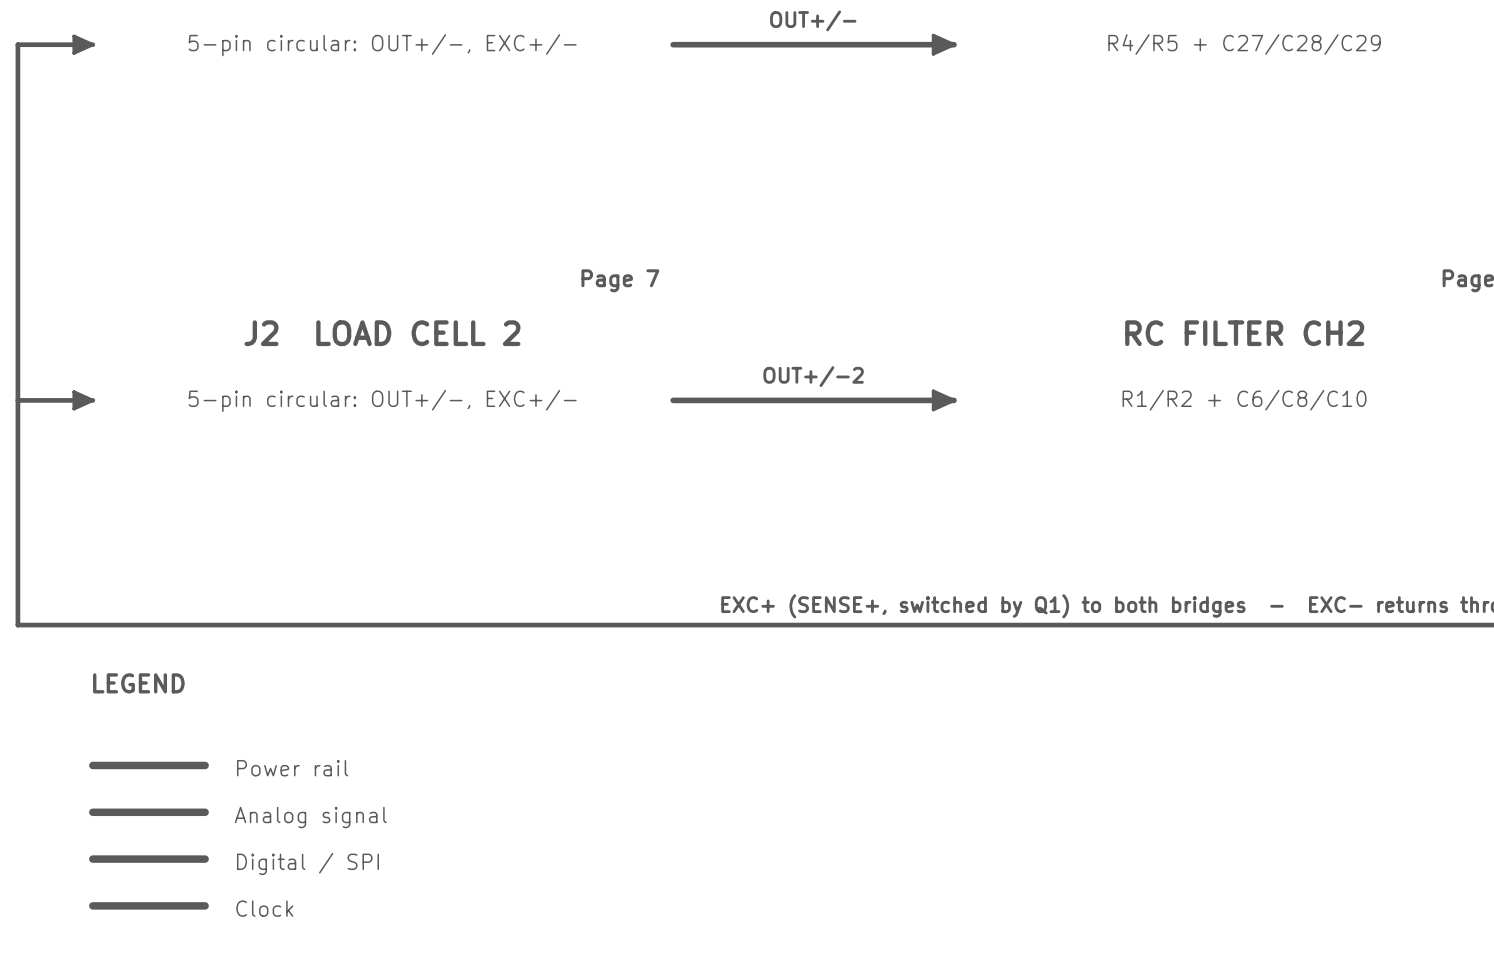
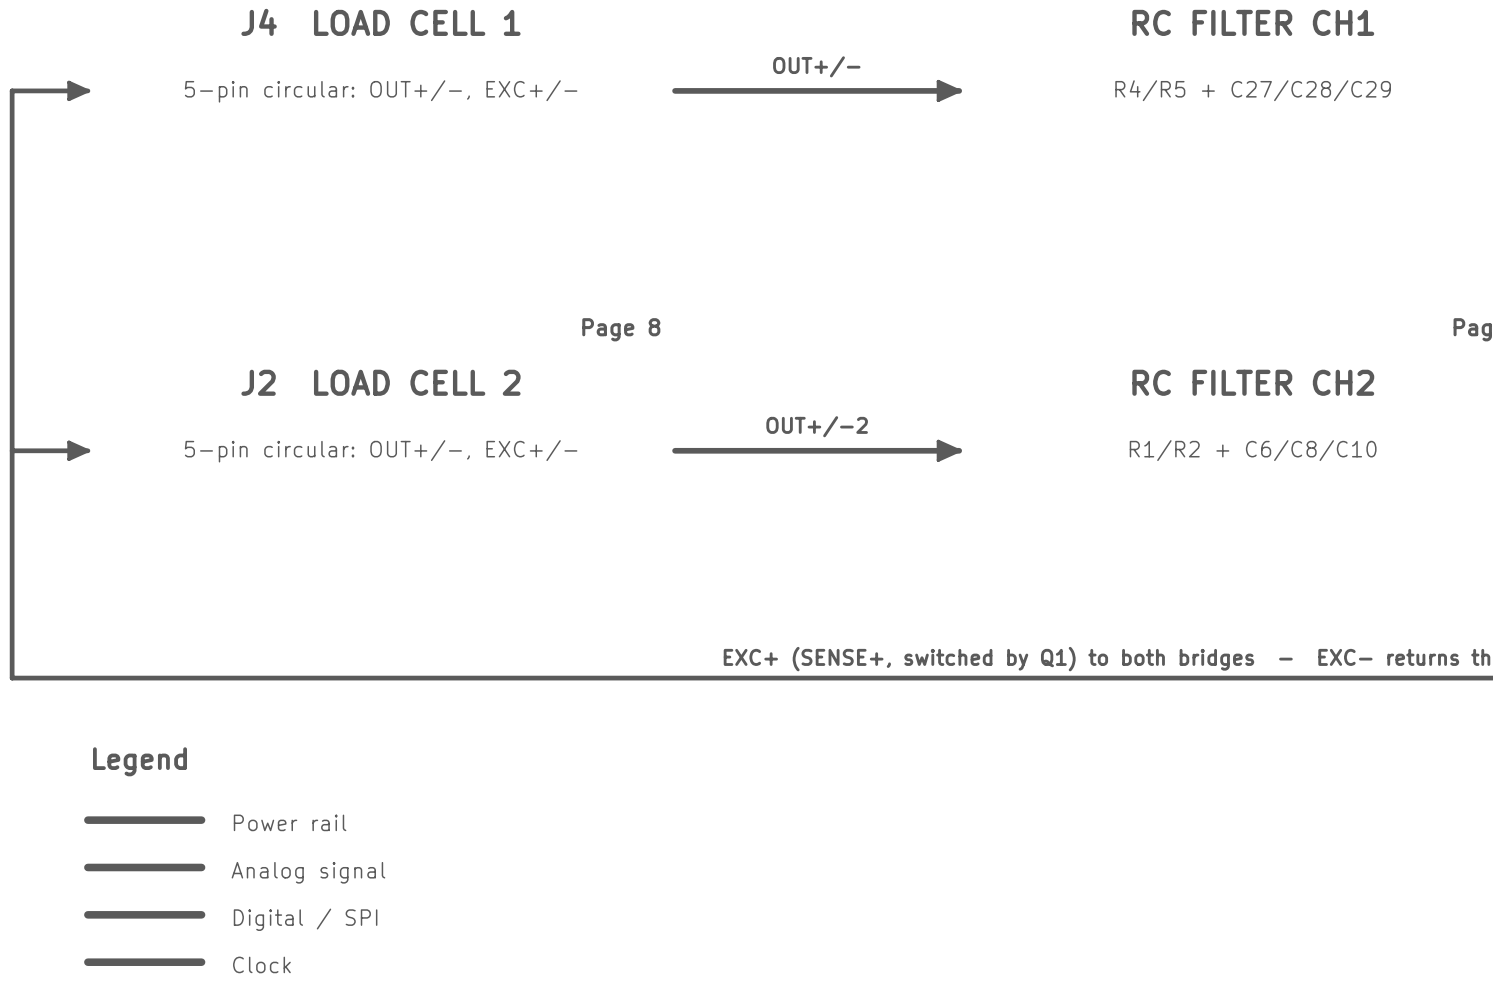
text: Page 7 (620, 280) -> Page 8 (621, 329)
text: LEGEND (138, 683) -> none
text: none -> Legend (140, 761)

